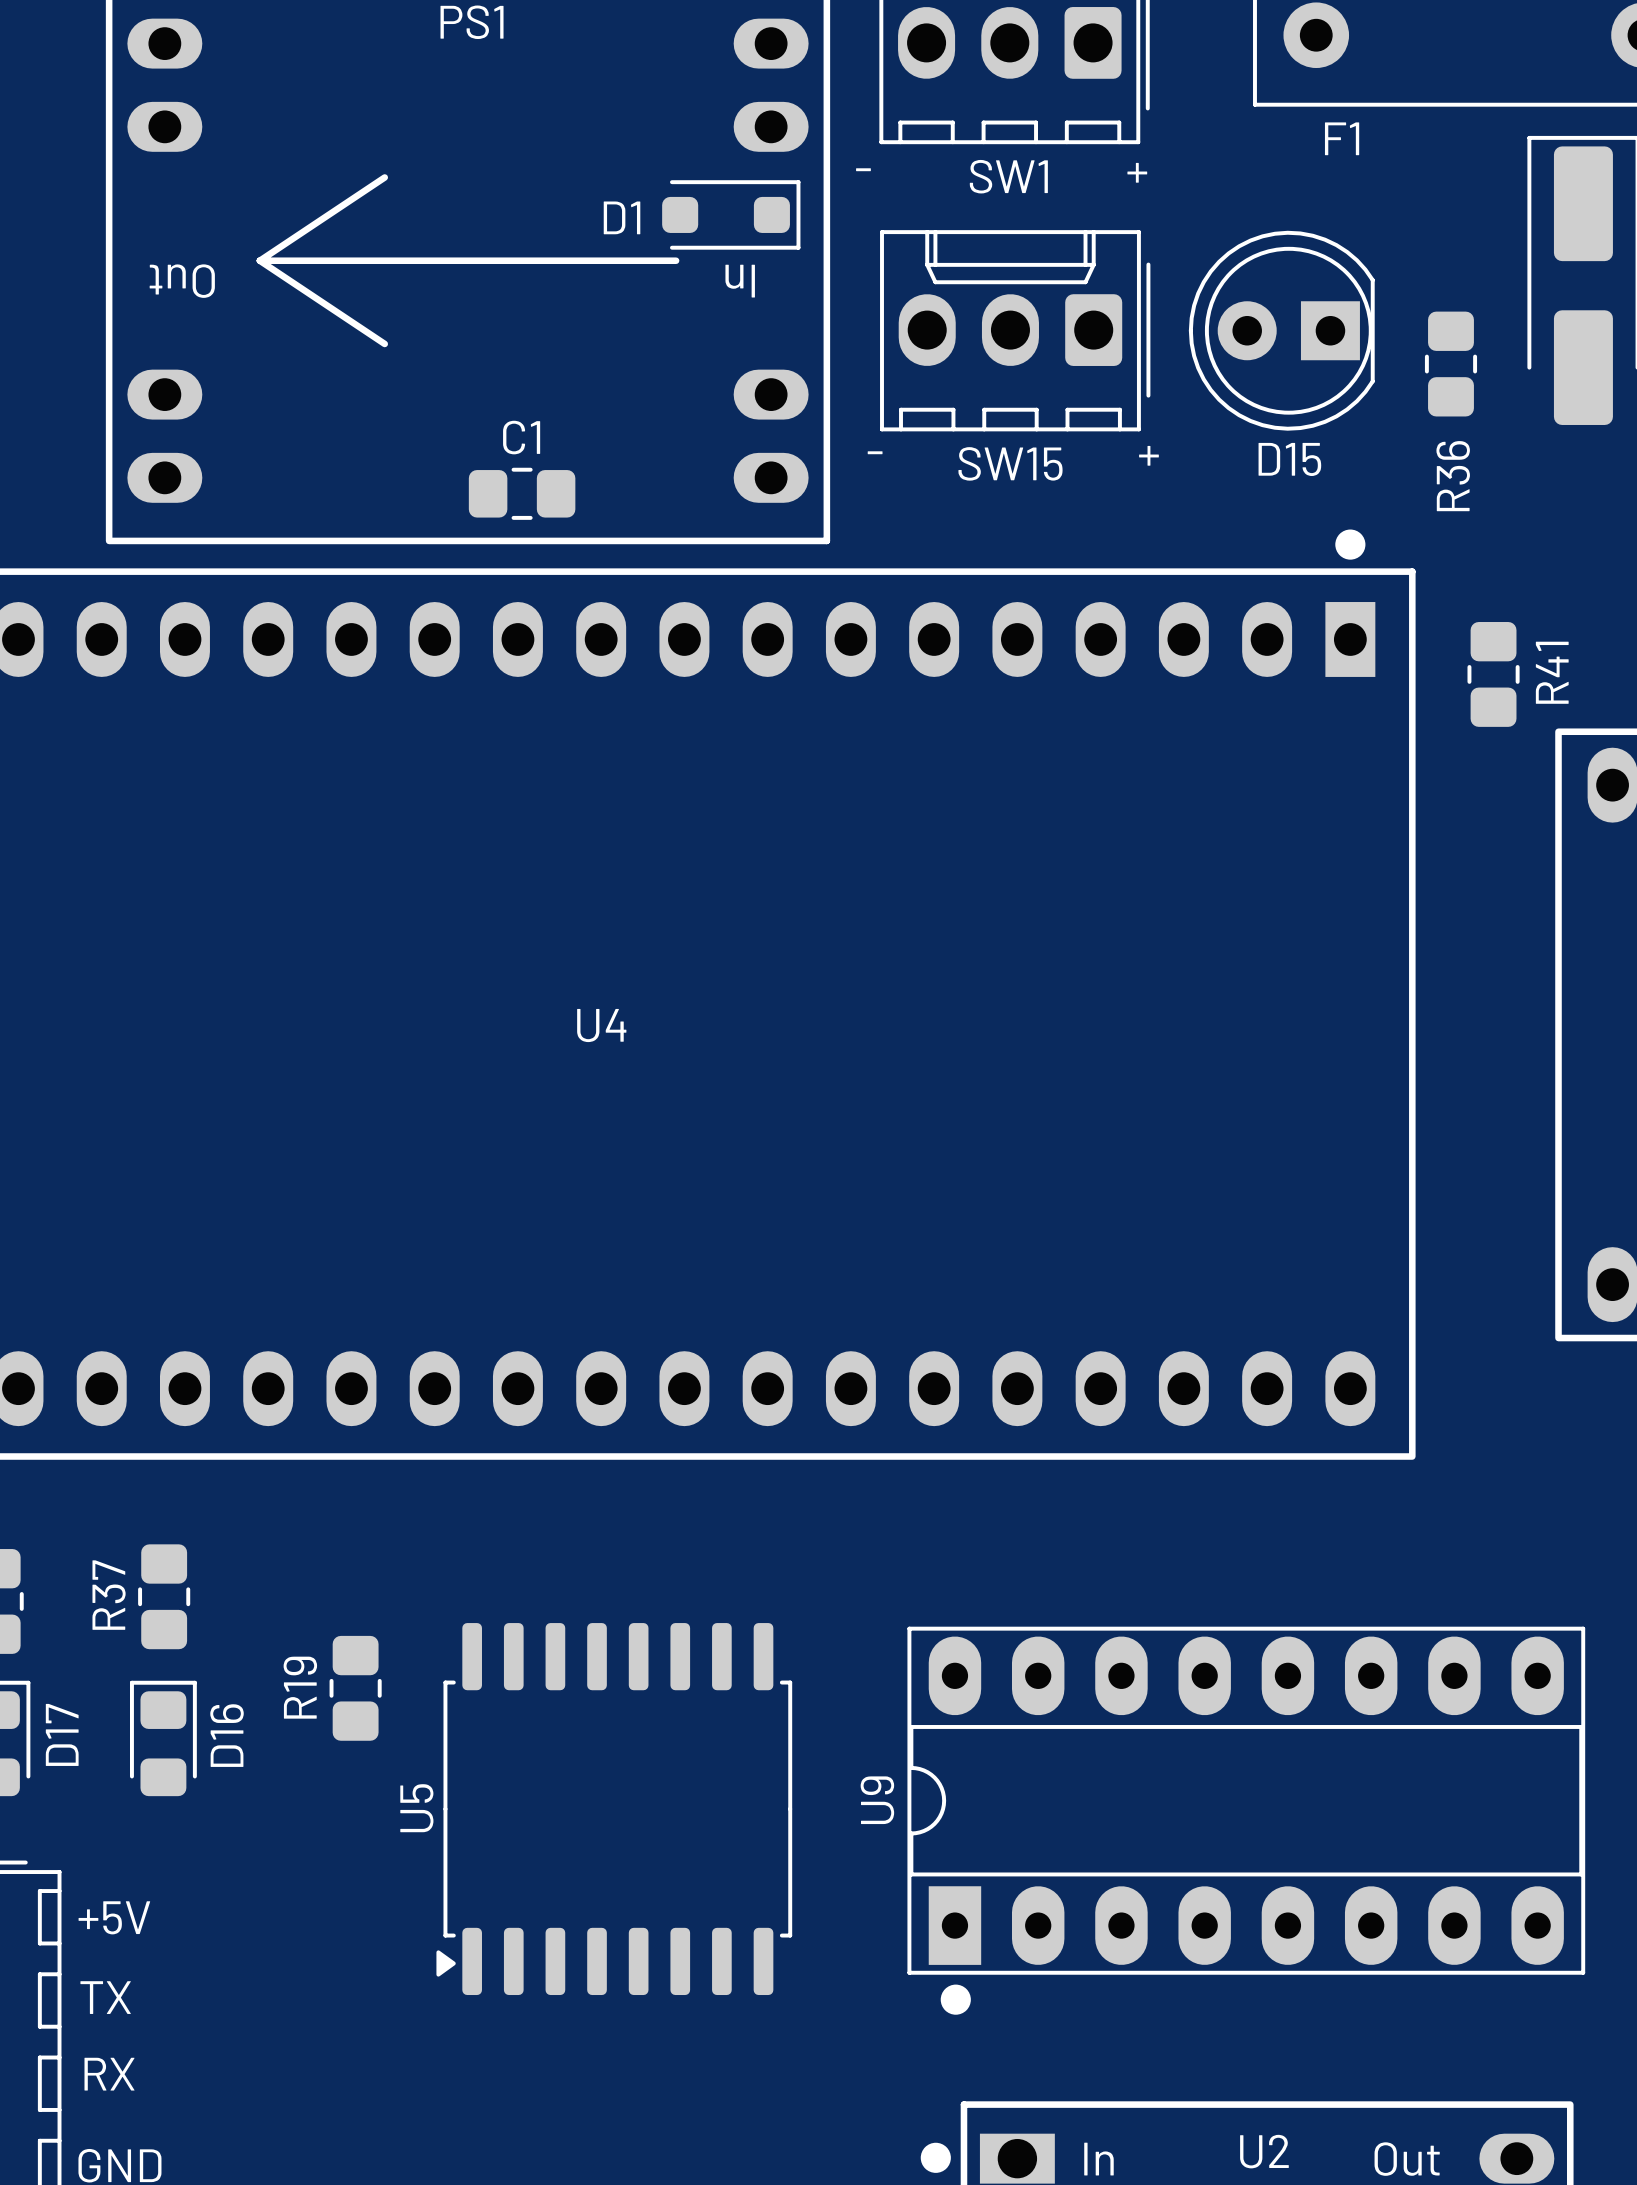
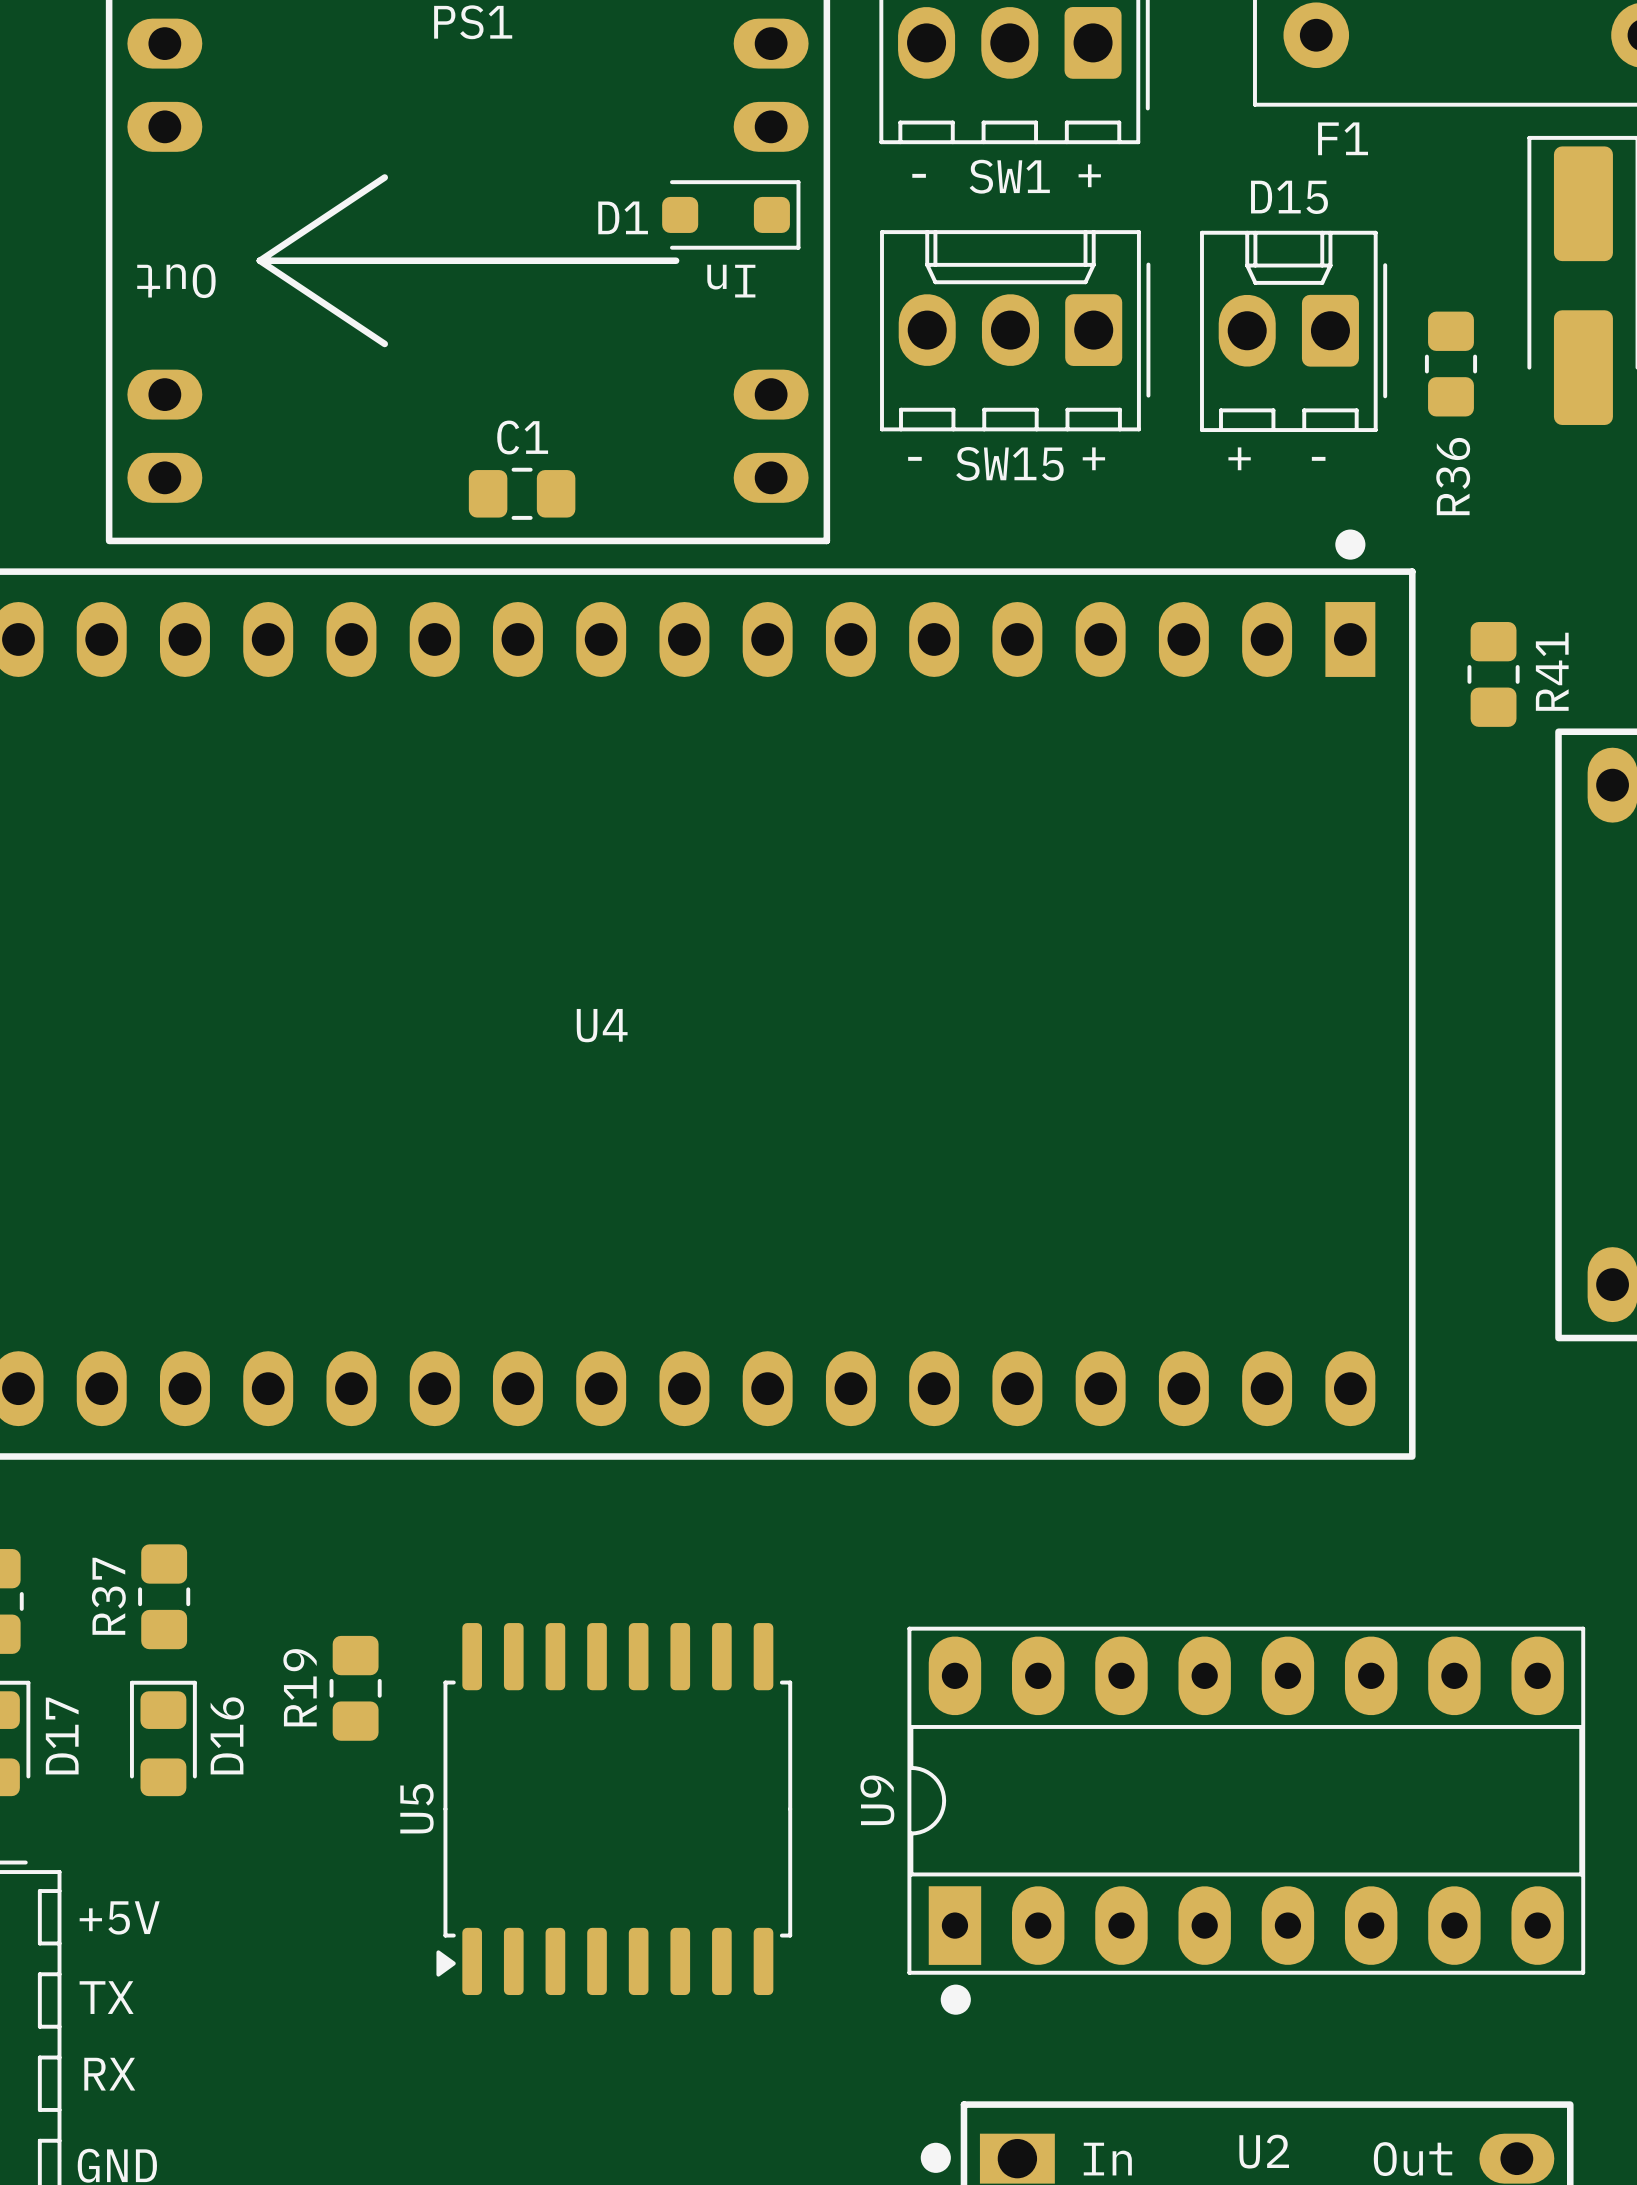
text position: - (863, 169) -> - (919, 175)
text position: + (1137, 172) -> + (1089, 175)
D15 footprint: [1188, 230, 1375, 431] -> [1200, 230, 1388, 433]
text position: - (875, 452) -> - (914, 458)
text: + (1148, 455) -> none
text: none -> + (1093, 458)
text: none -> + (1239, 458)
text: none -> - (1318, 458)
D15 name position: D15 (1289, 459) -> D15 (1289, 197)

